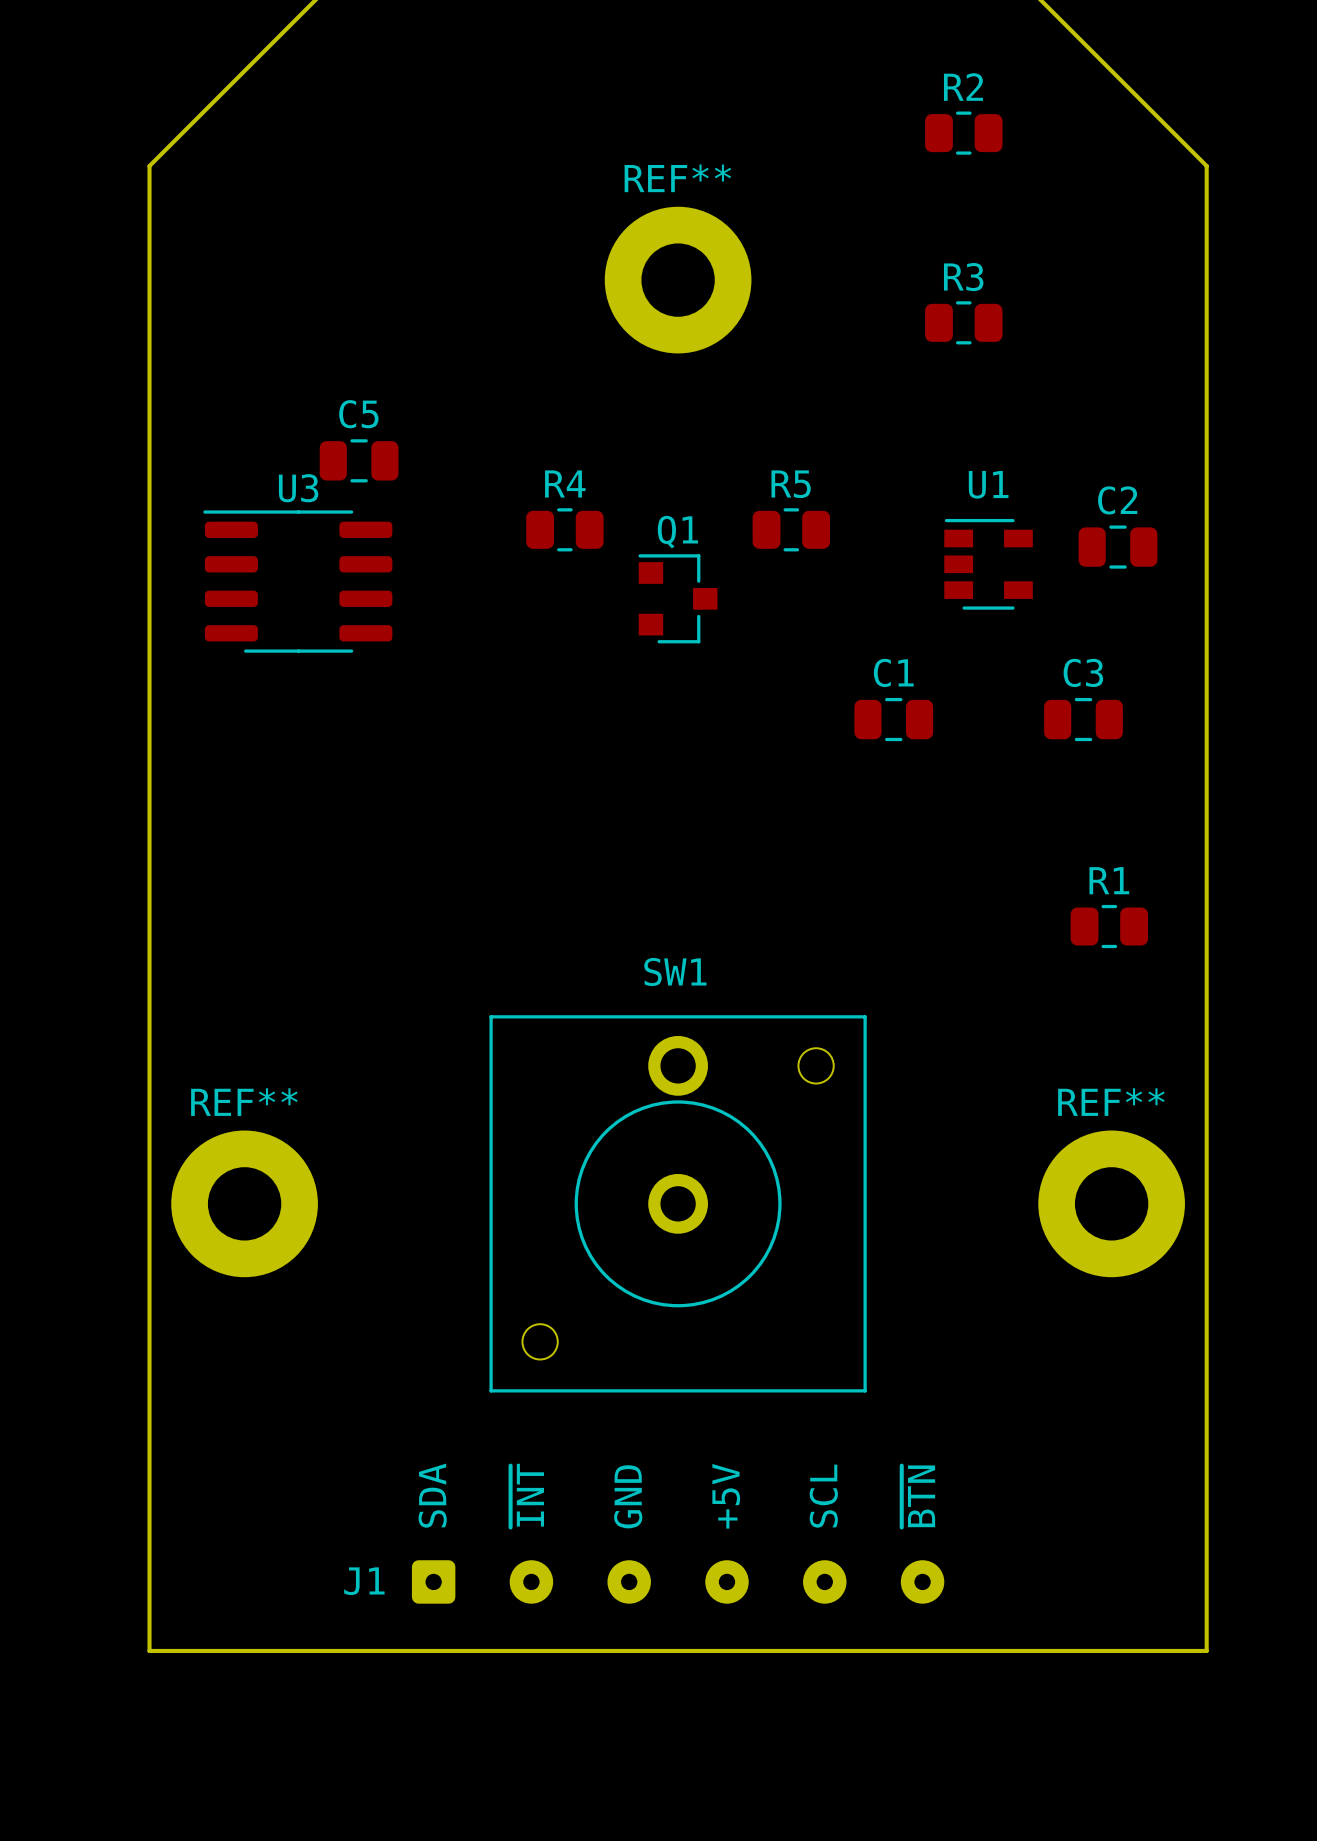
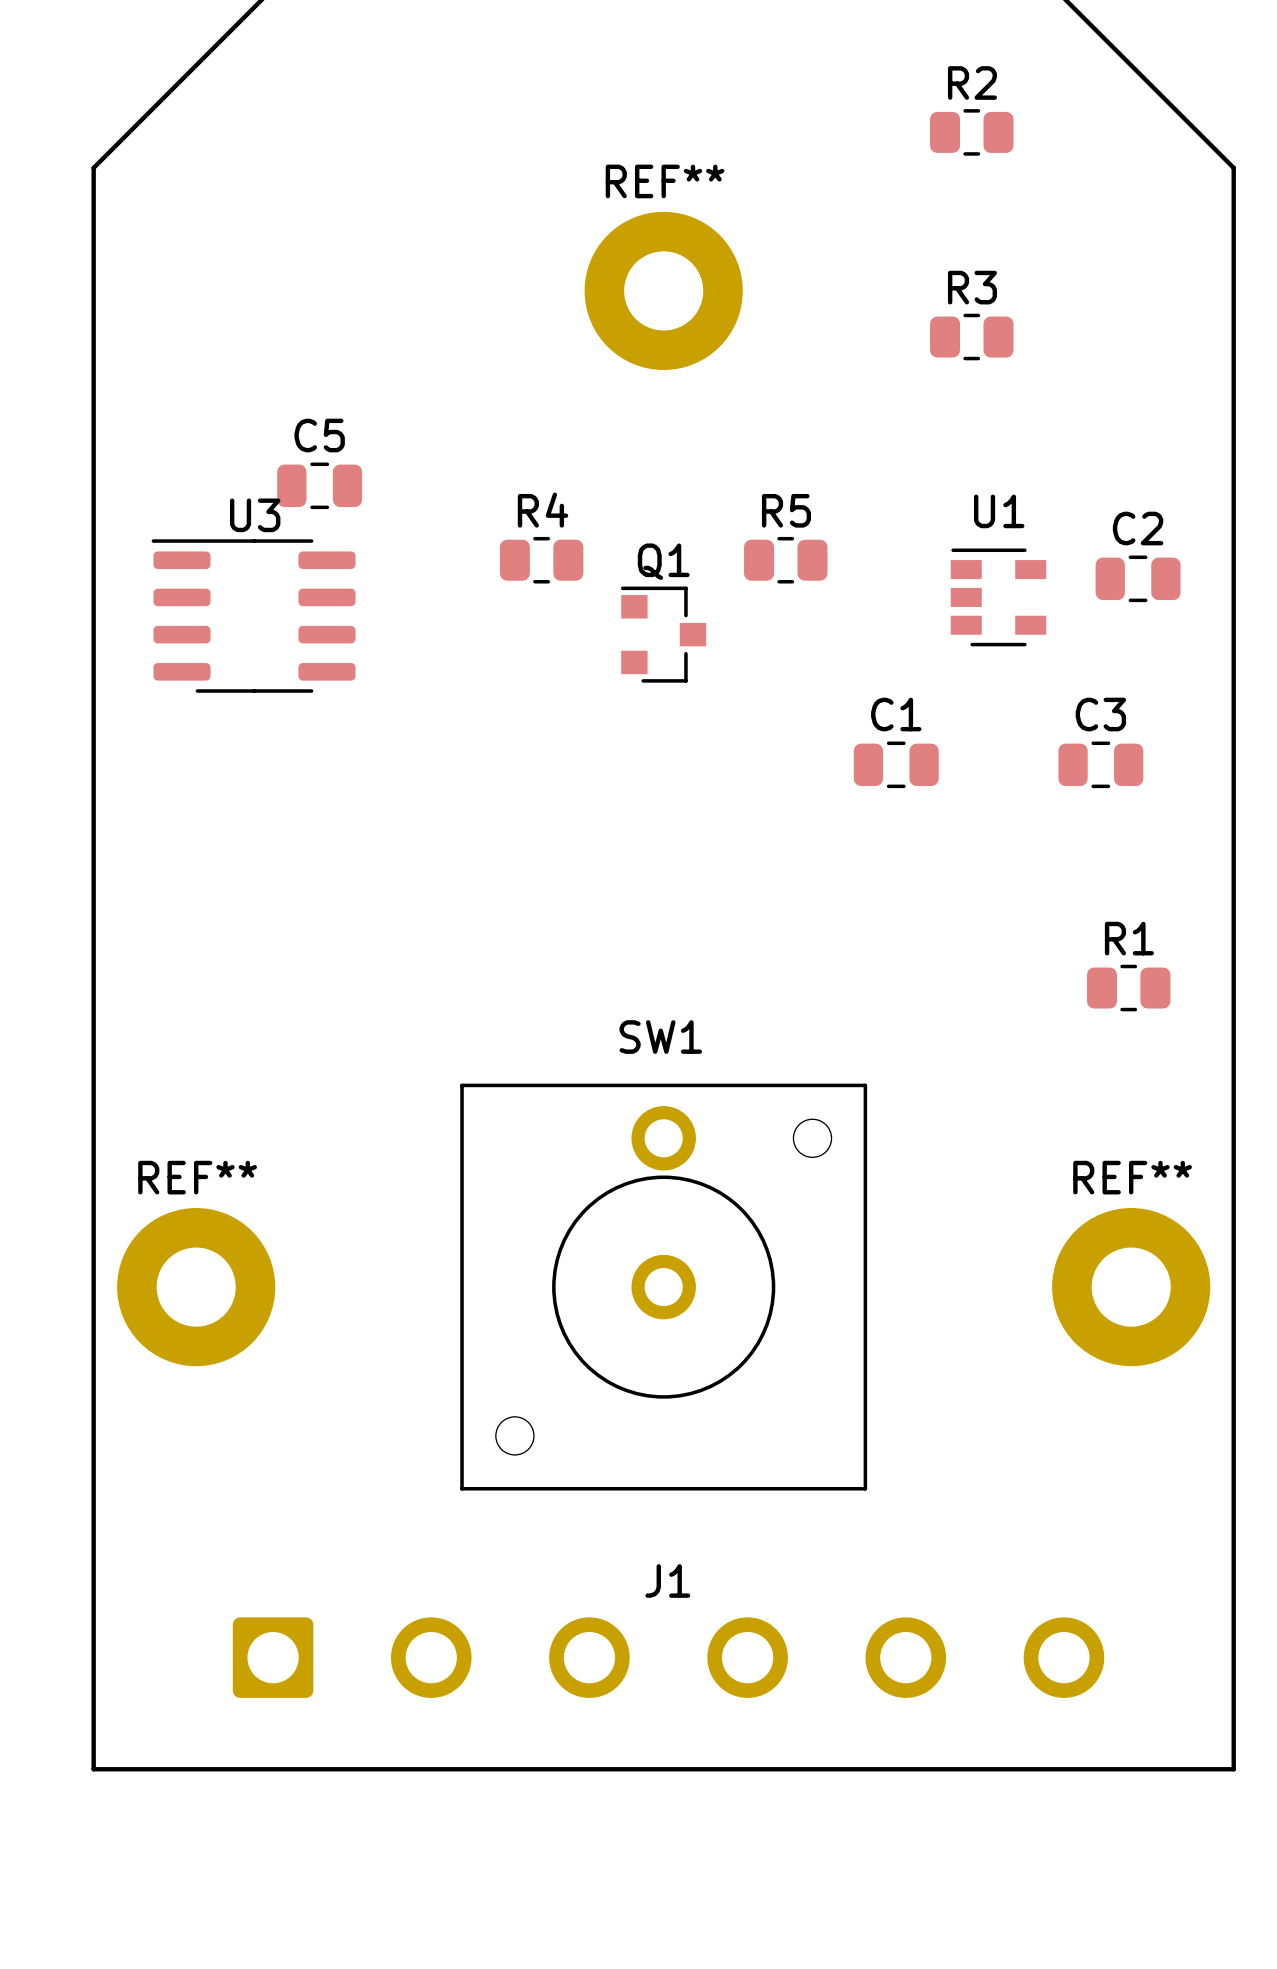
text: SDA (432, 1495) -> none
text: ~{INT} (527, 1495) -> none
text: GND (628, 1496) -> none
text: +5V (726, 1496) -> none
text: SCL (823, 1496) -> none
text: ~{BTN} (918, 1496) -> none
J1 footprint: [411, 1560, 945, 1604] -> [232, 1617, 1105, 1698]
J1 name position: J1 (364, 1581) -> J1 (667, 1580)

